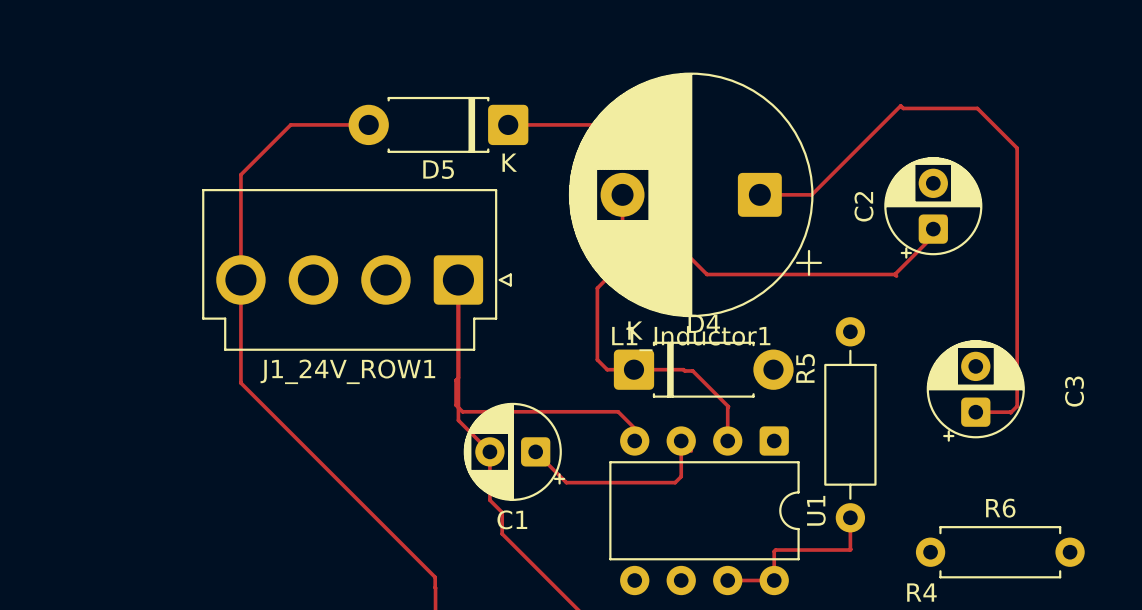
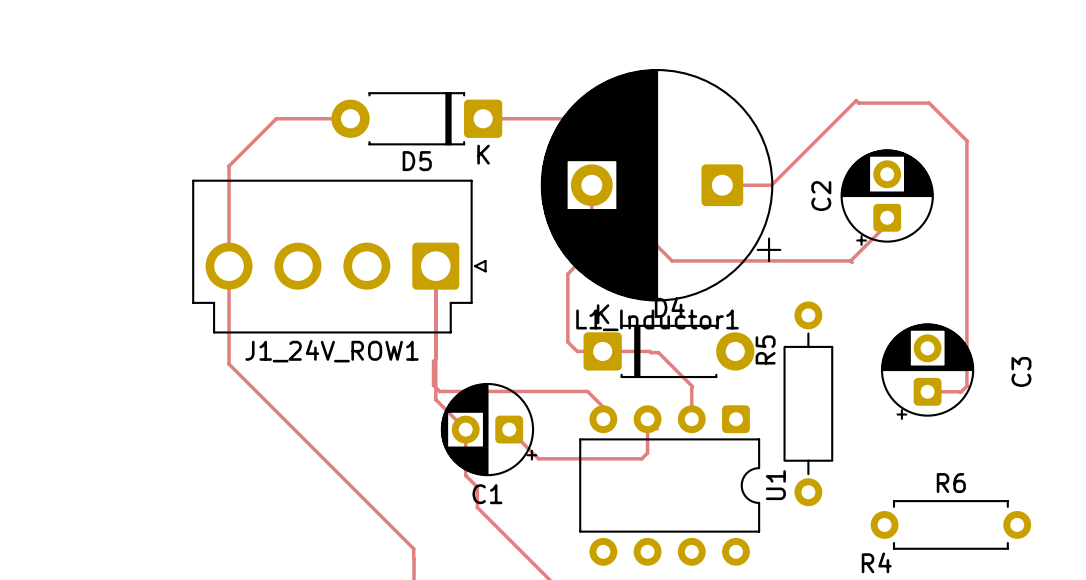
top track: (850, 517) (850, 550) (775, 550) (774, 580) (727, 580) -> none

